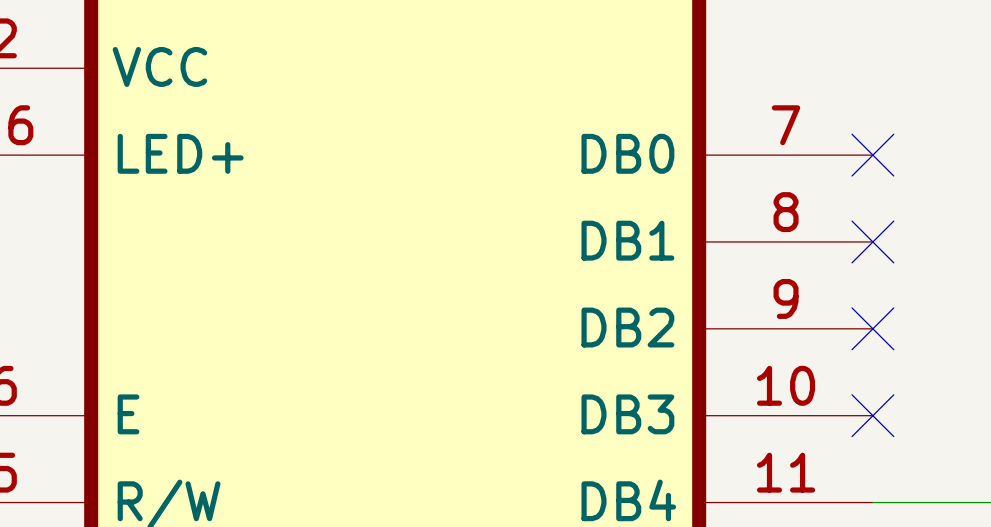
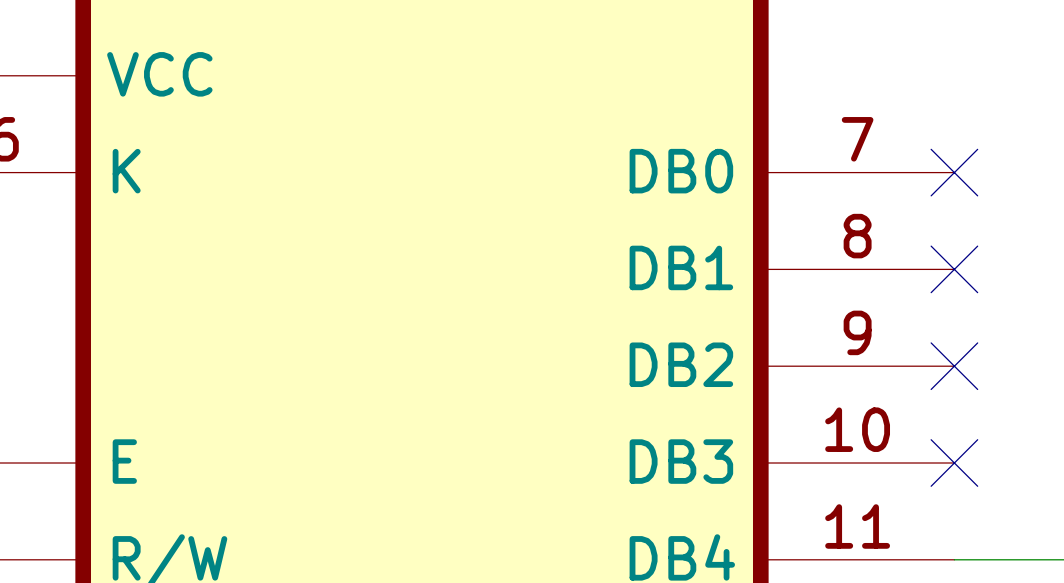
part pin name: LED+ (180, 153) -> K (126, 171)

